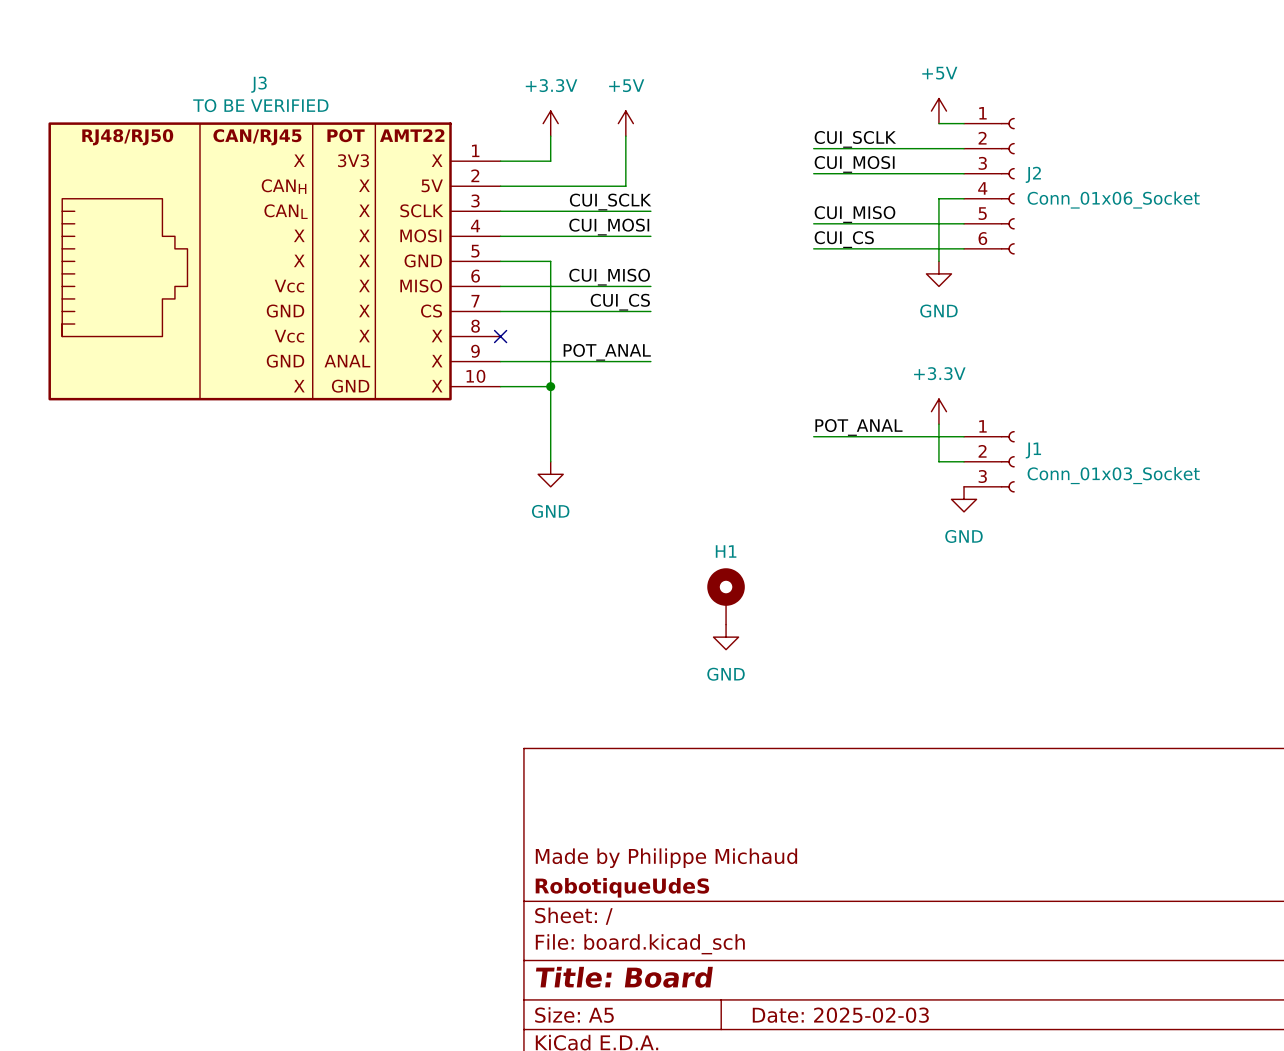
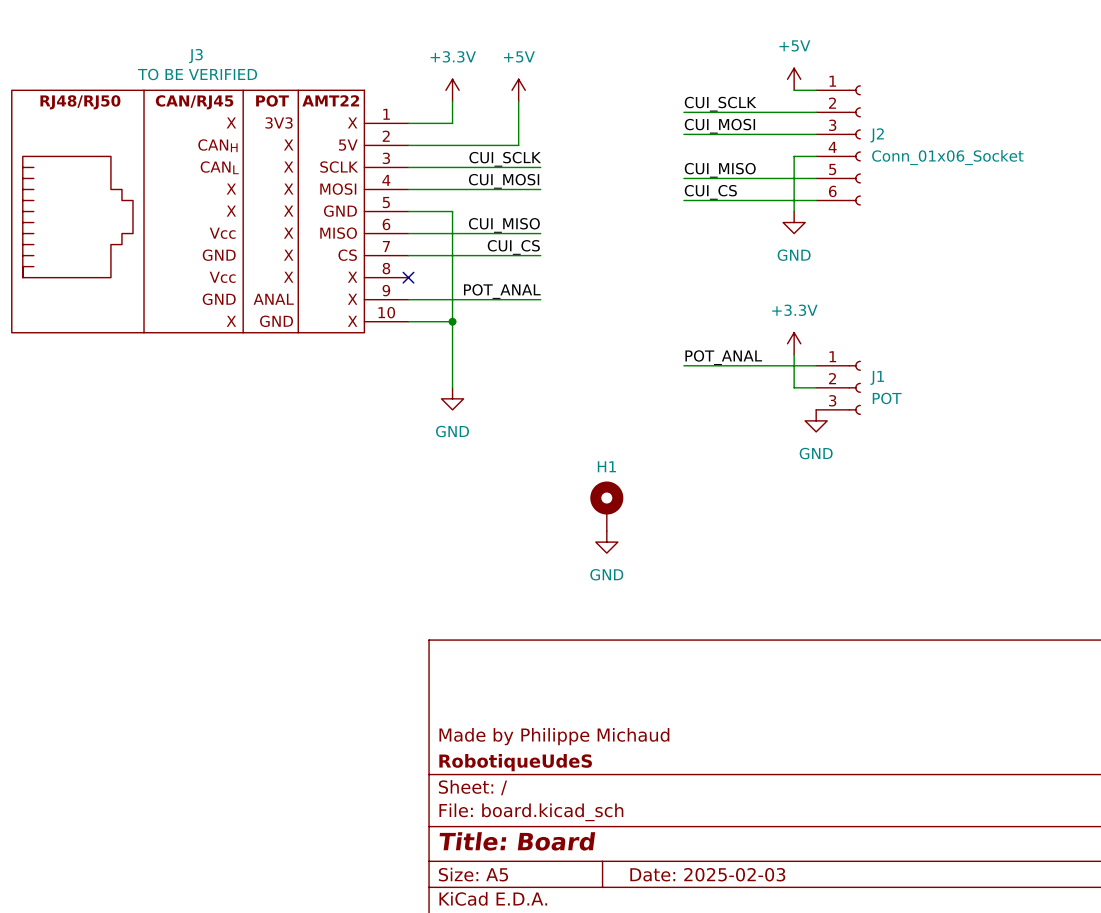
J3 symbol: [48, 122, 501, 401] -> [11, 90, 409, 333]
J1 value: Conn_01x03_Socket (1113, 475) -> POT (887, 398)

